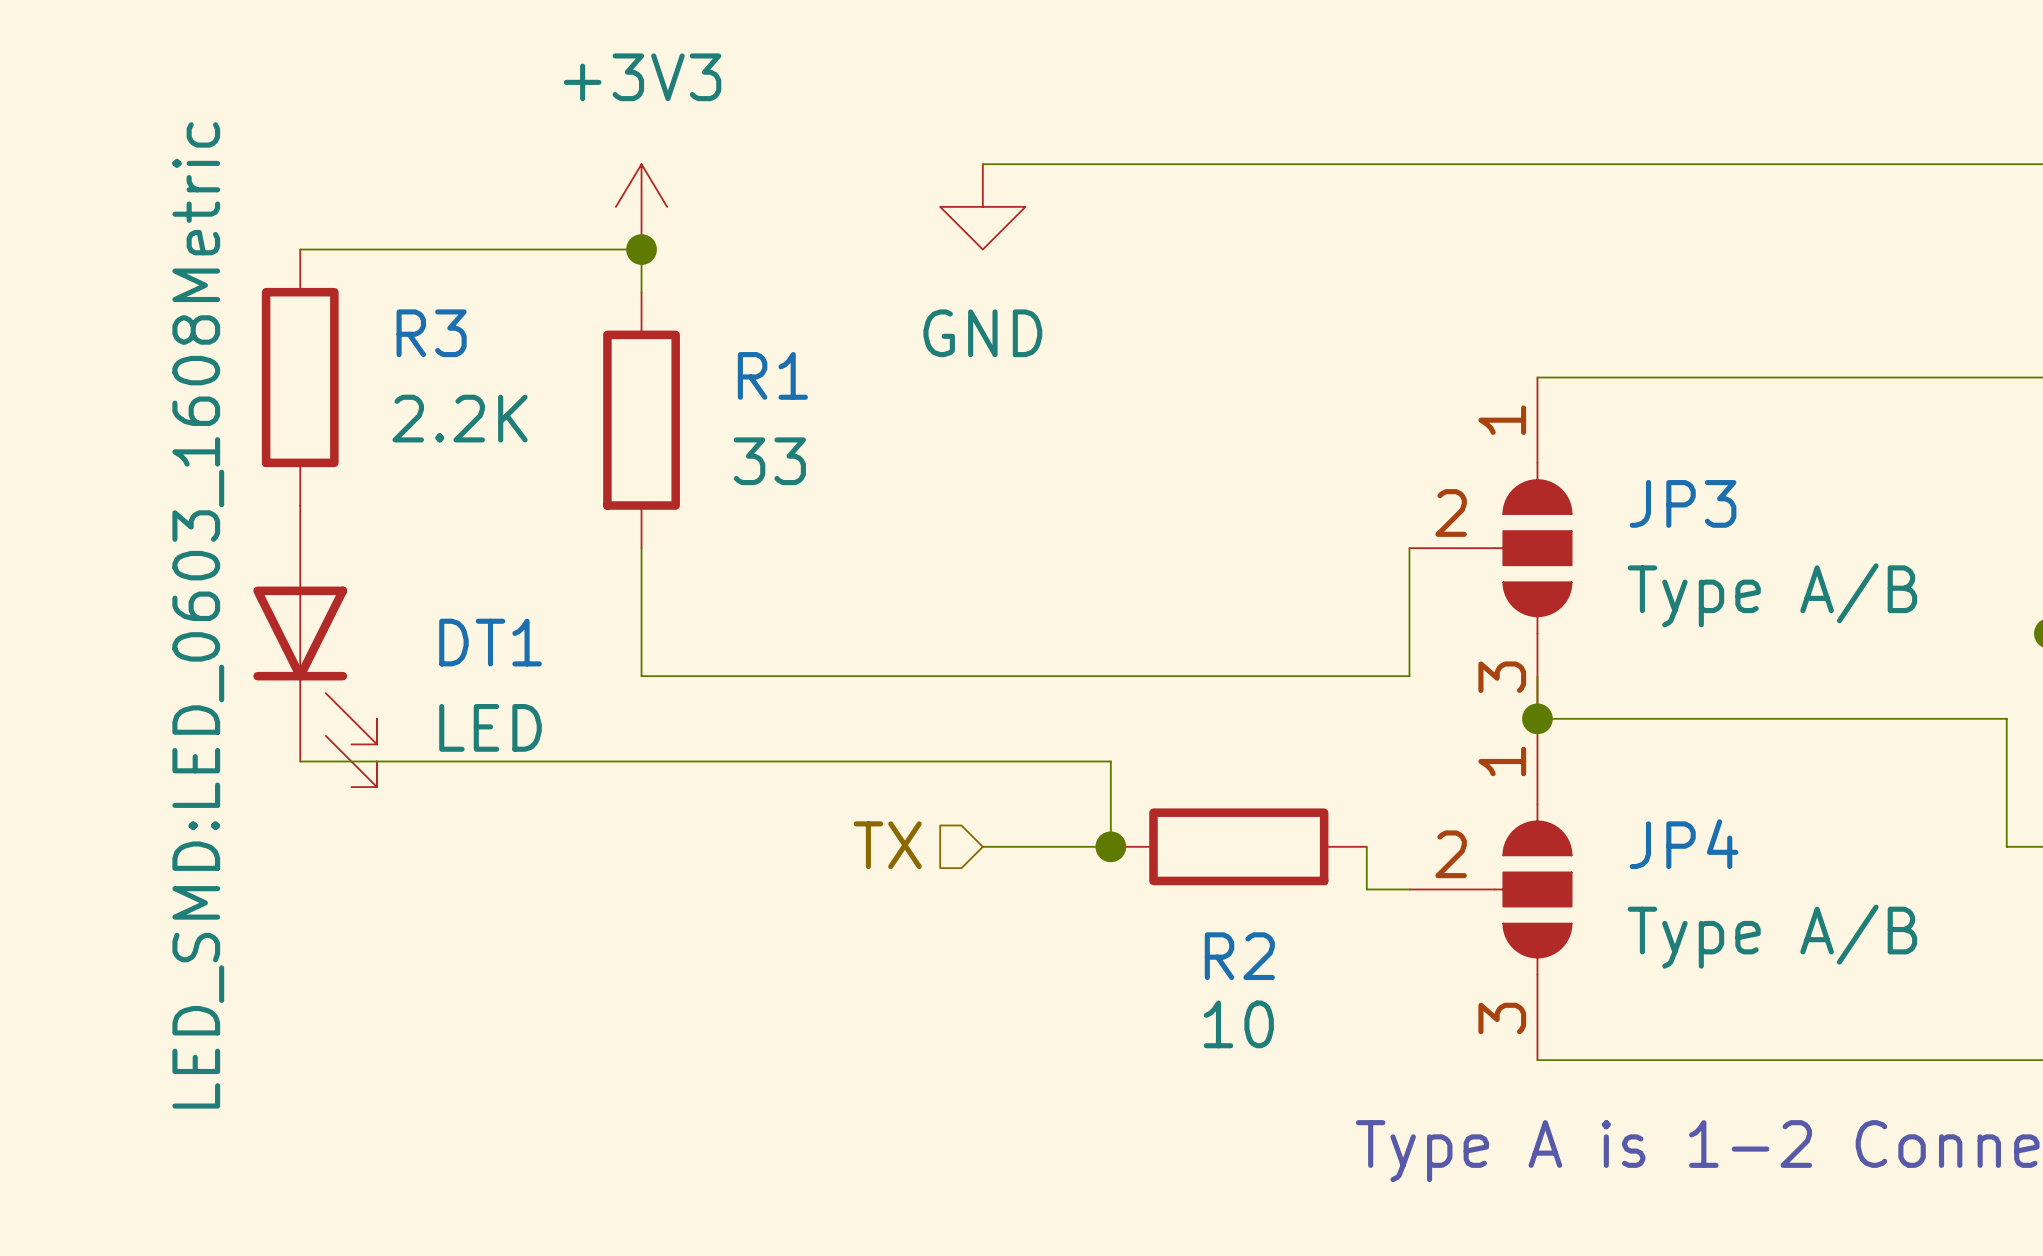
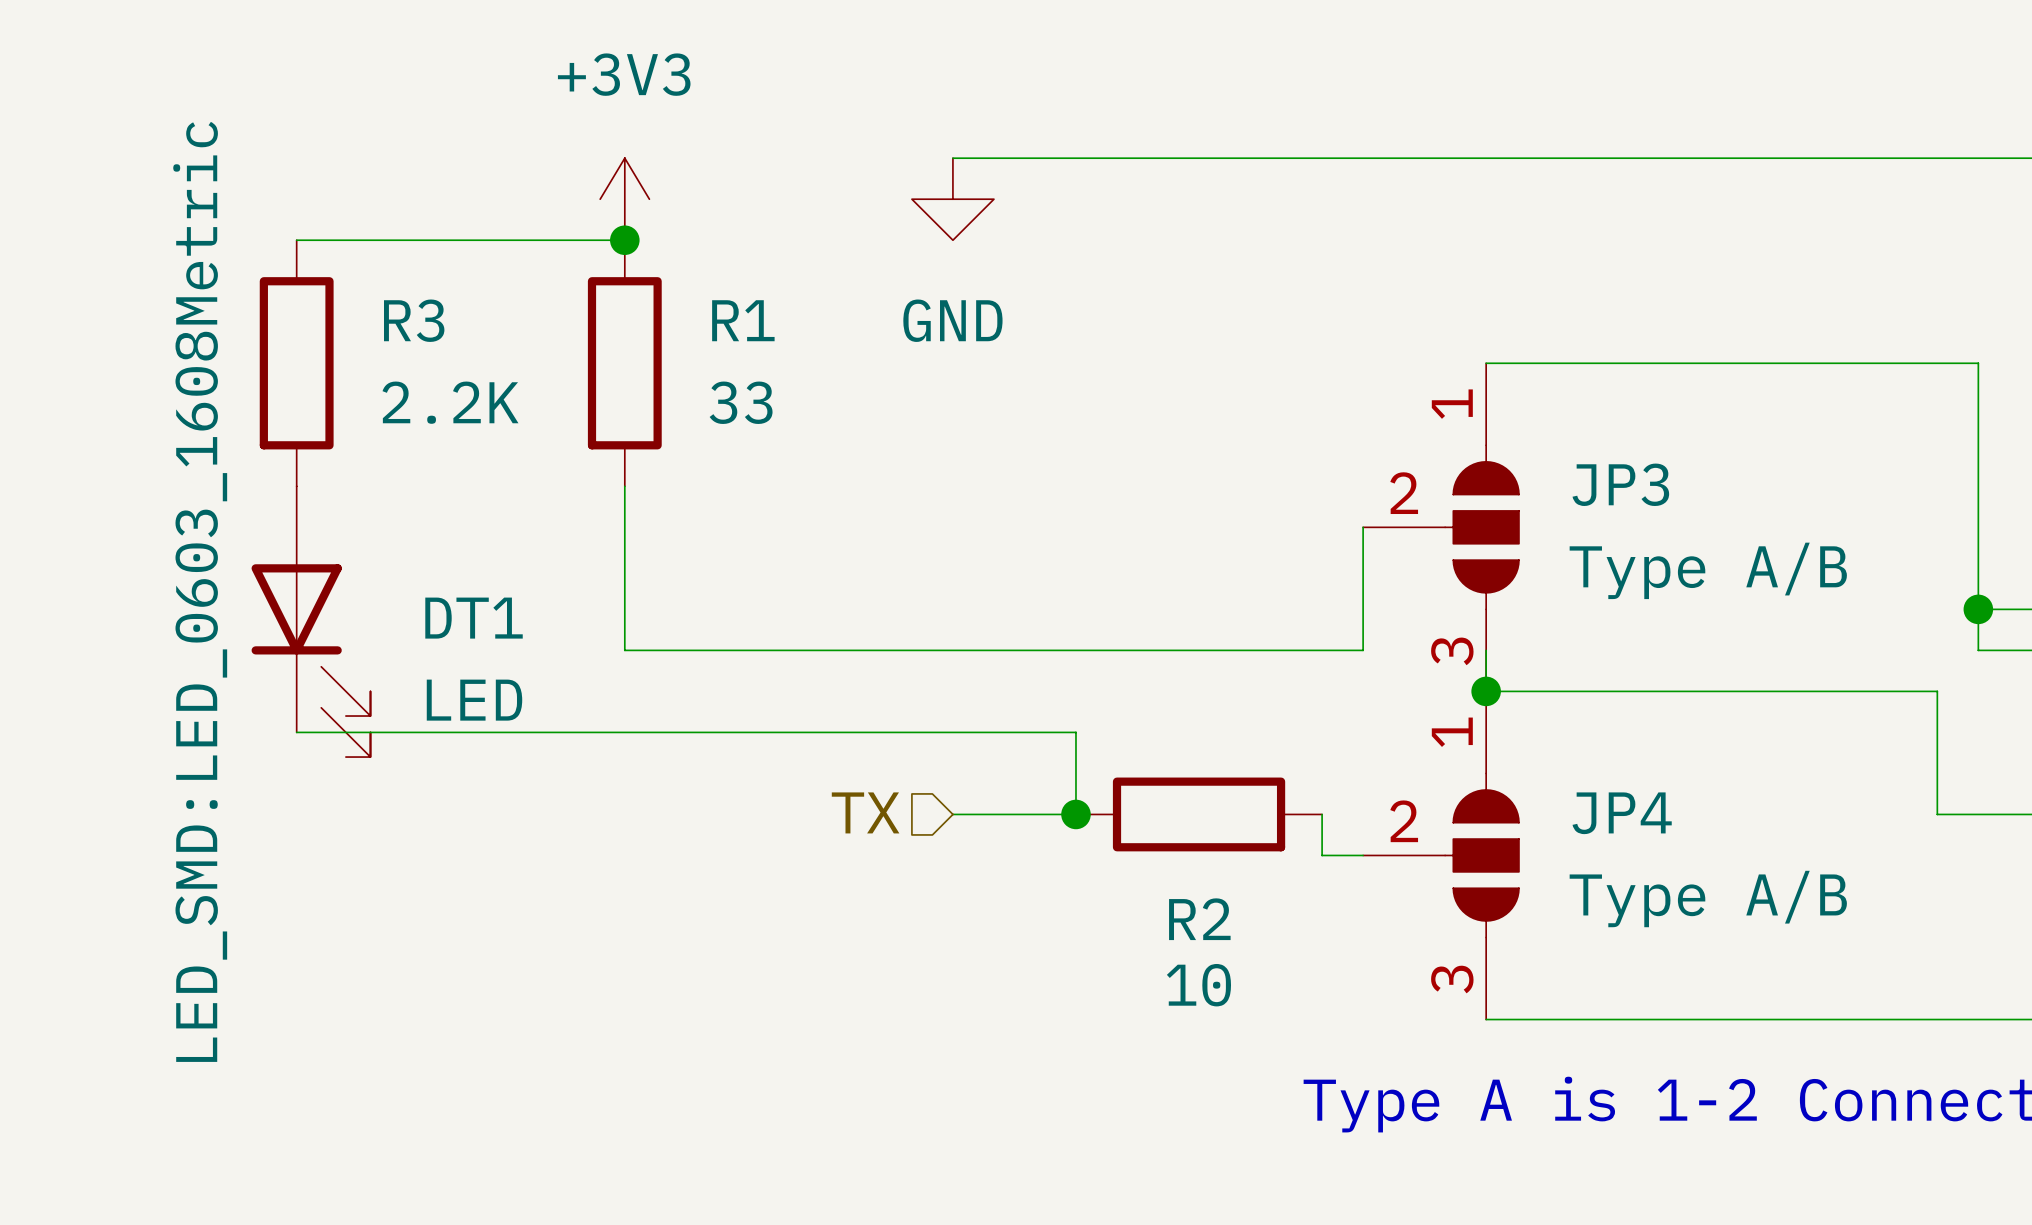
R1 position: (641, 420) -> (624, 363)

